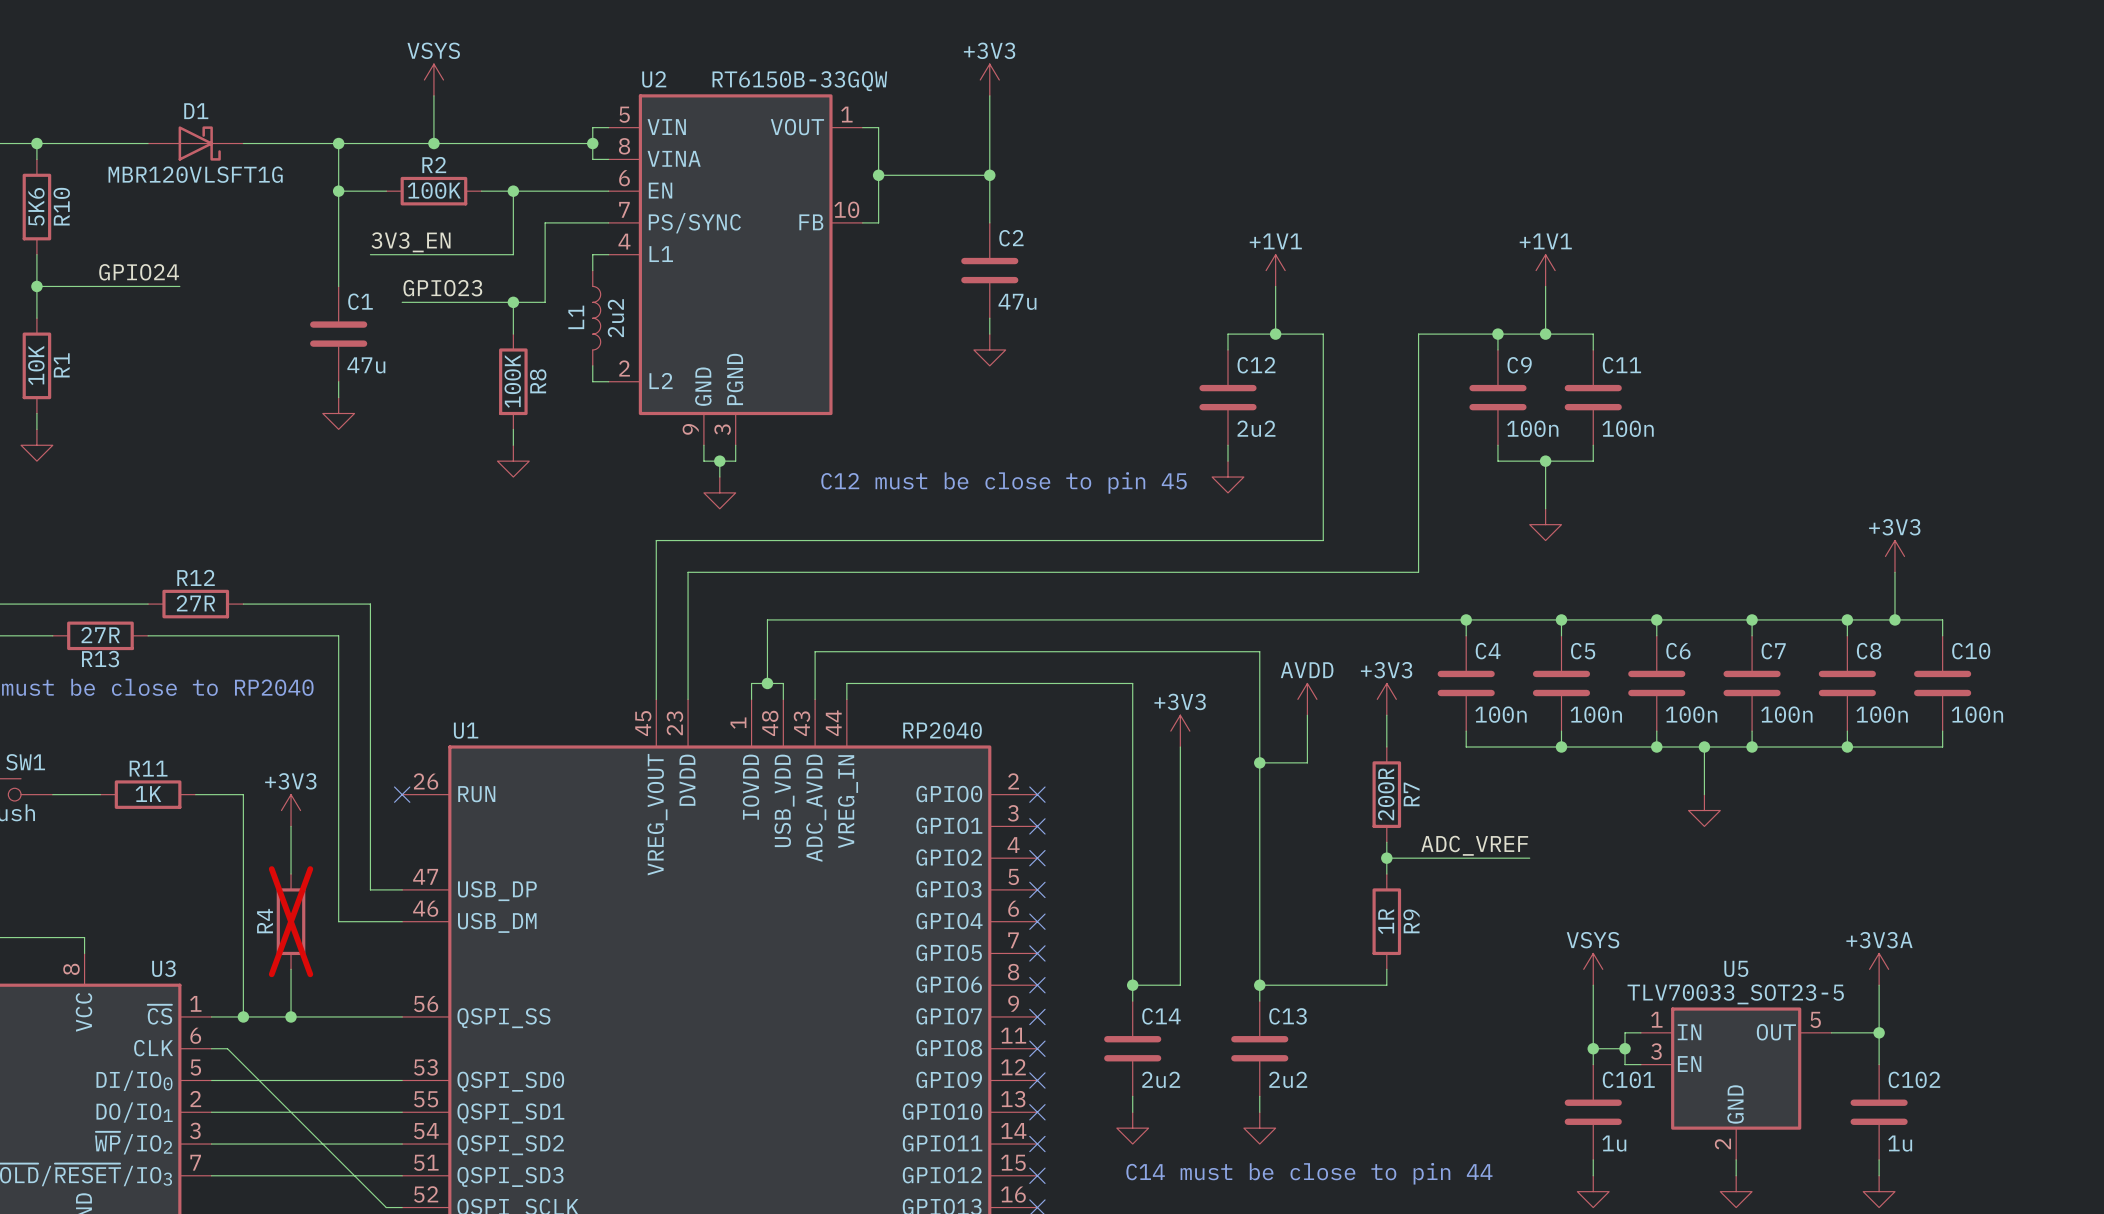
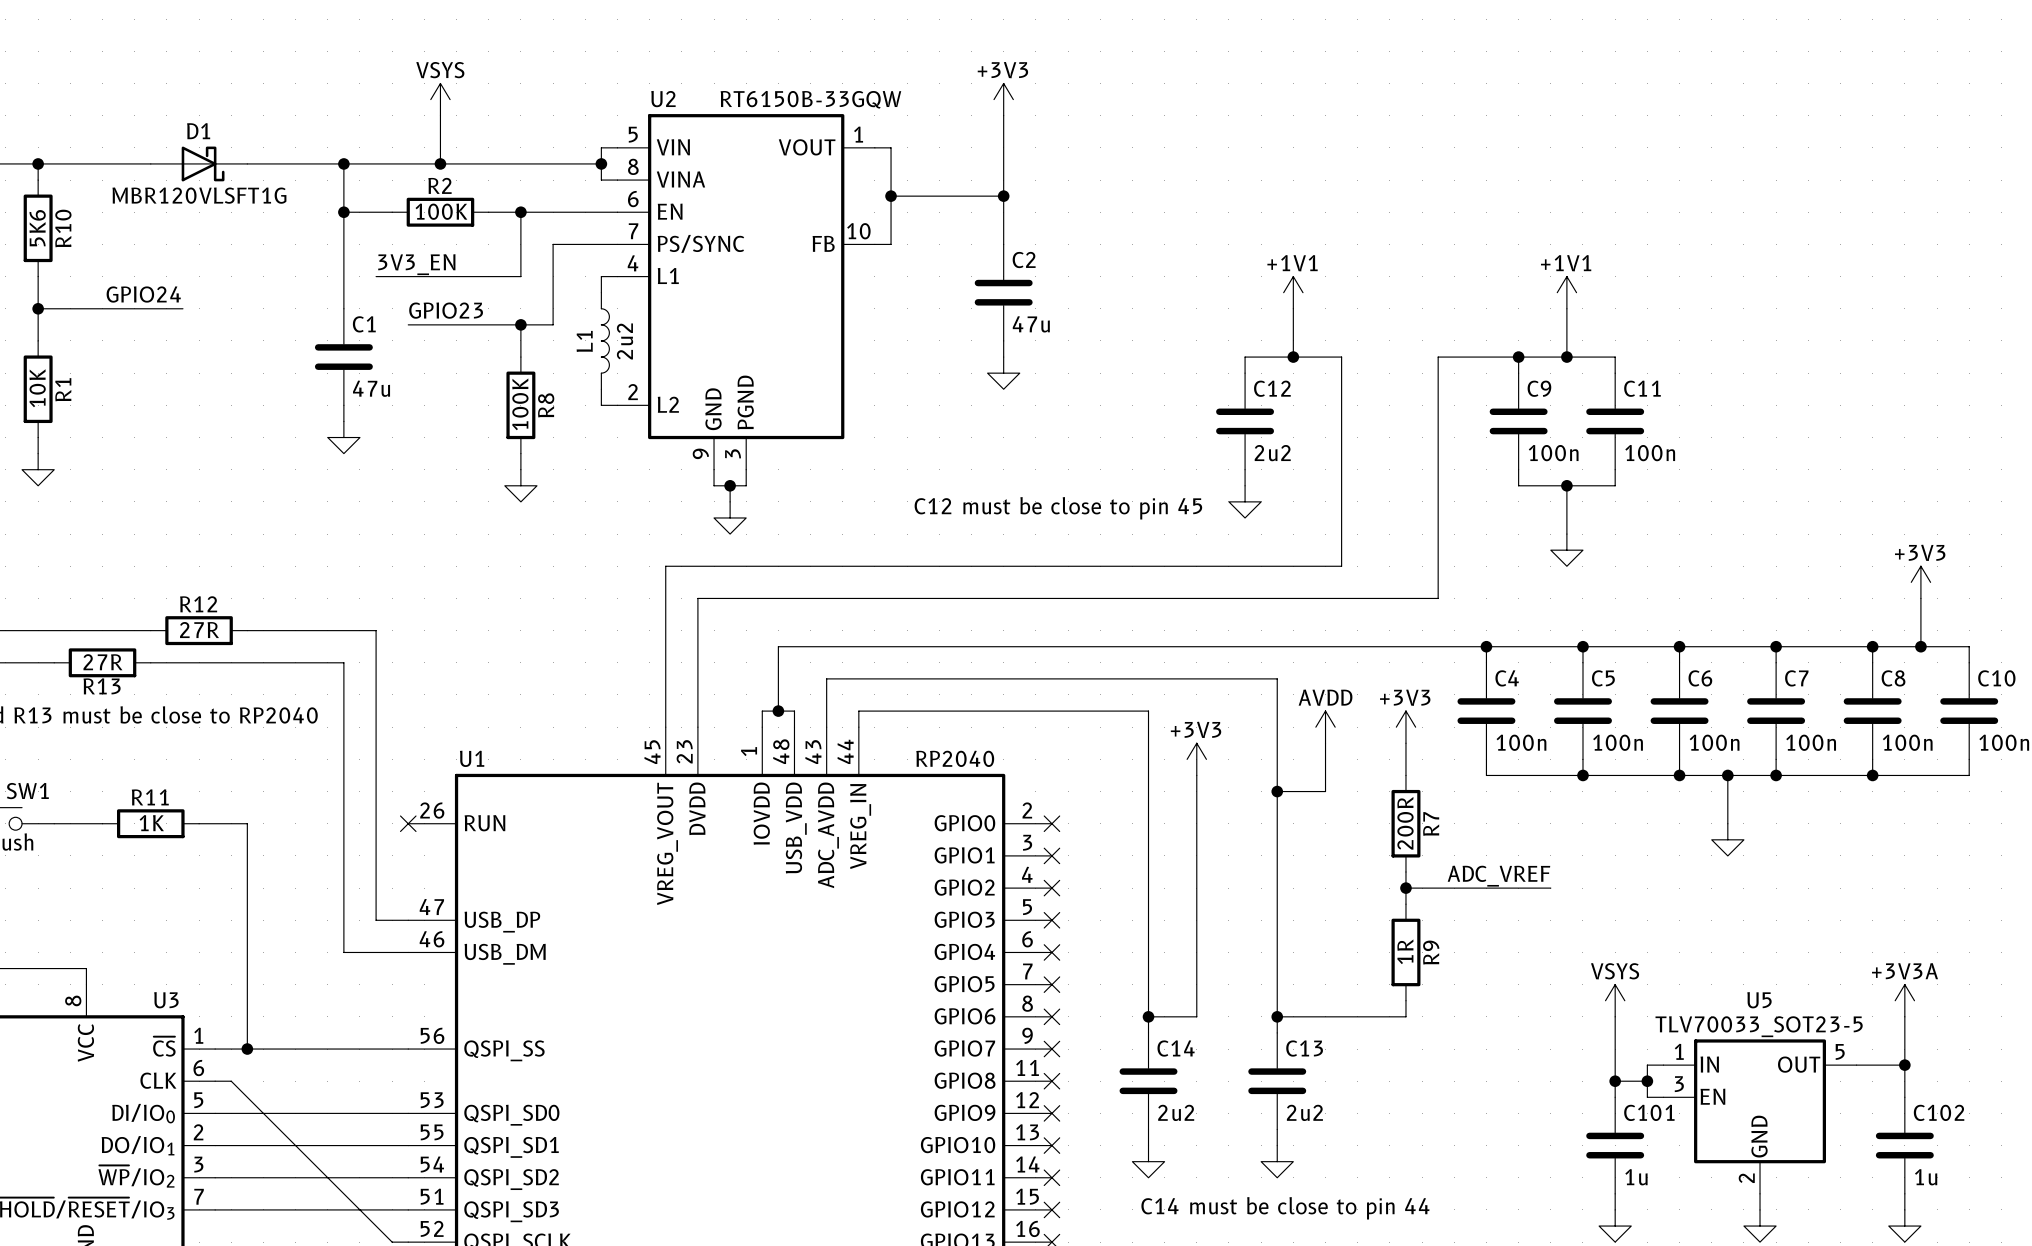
power symbol: +3V3 (291, 810) -> none
wire: (291, 826) (291, 874) -> none
R4: (291, 921) -> none
wire: (291, 969) (291, 1016) -> none
junction: (291, 1016) -> none

